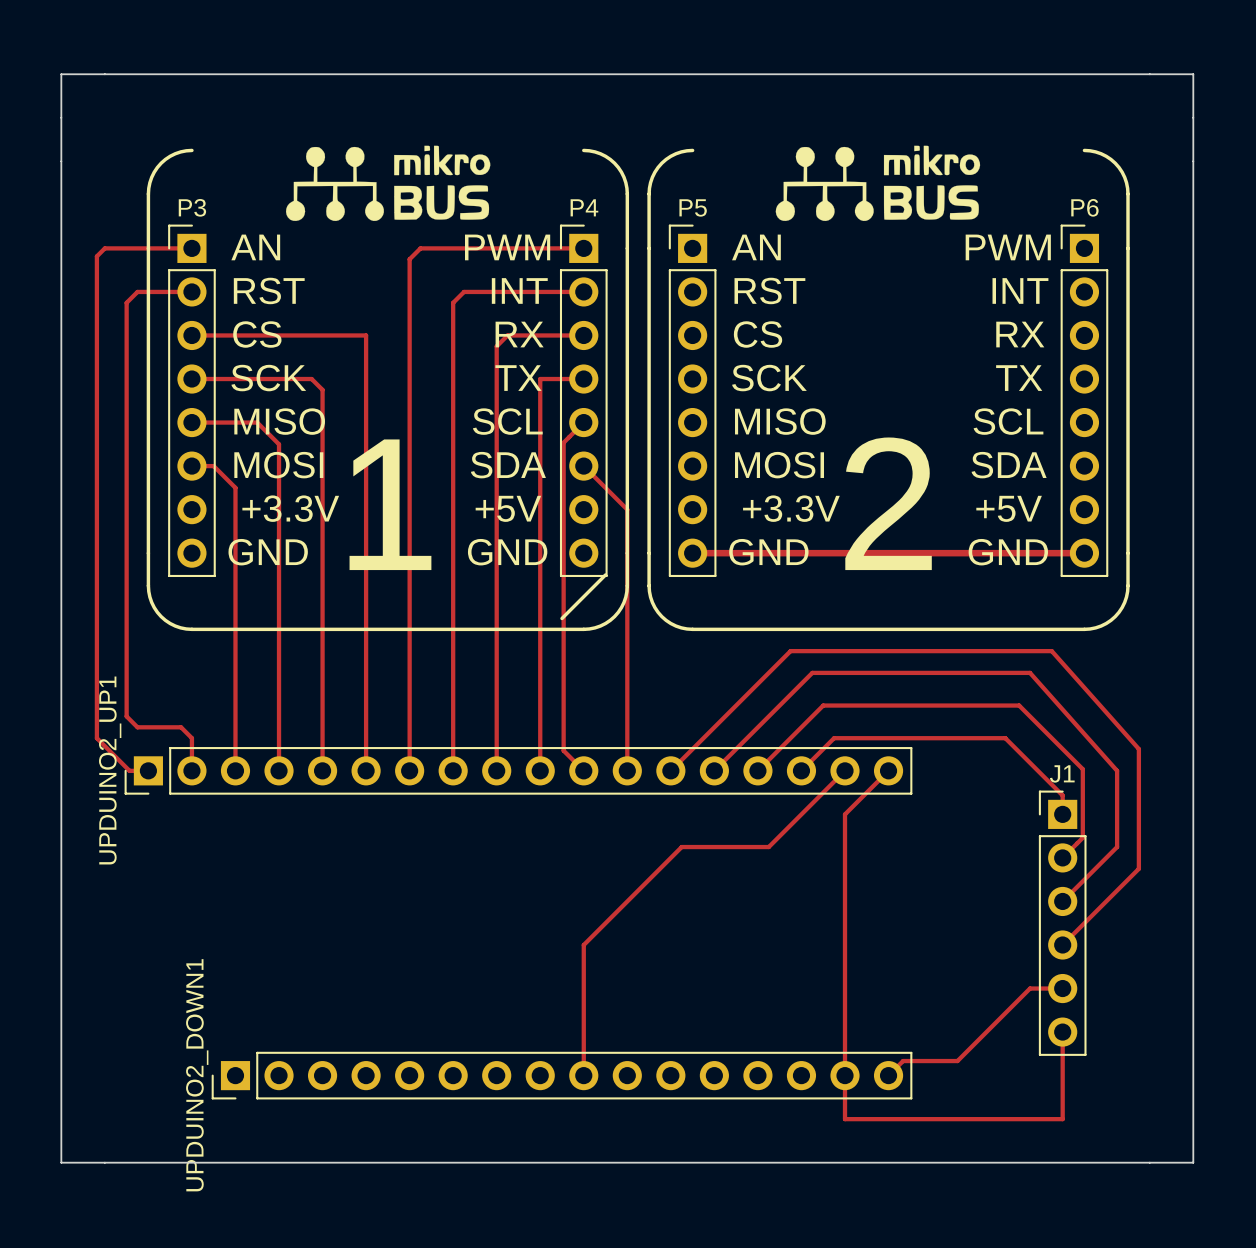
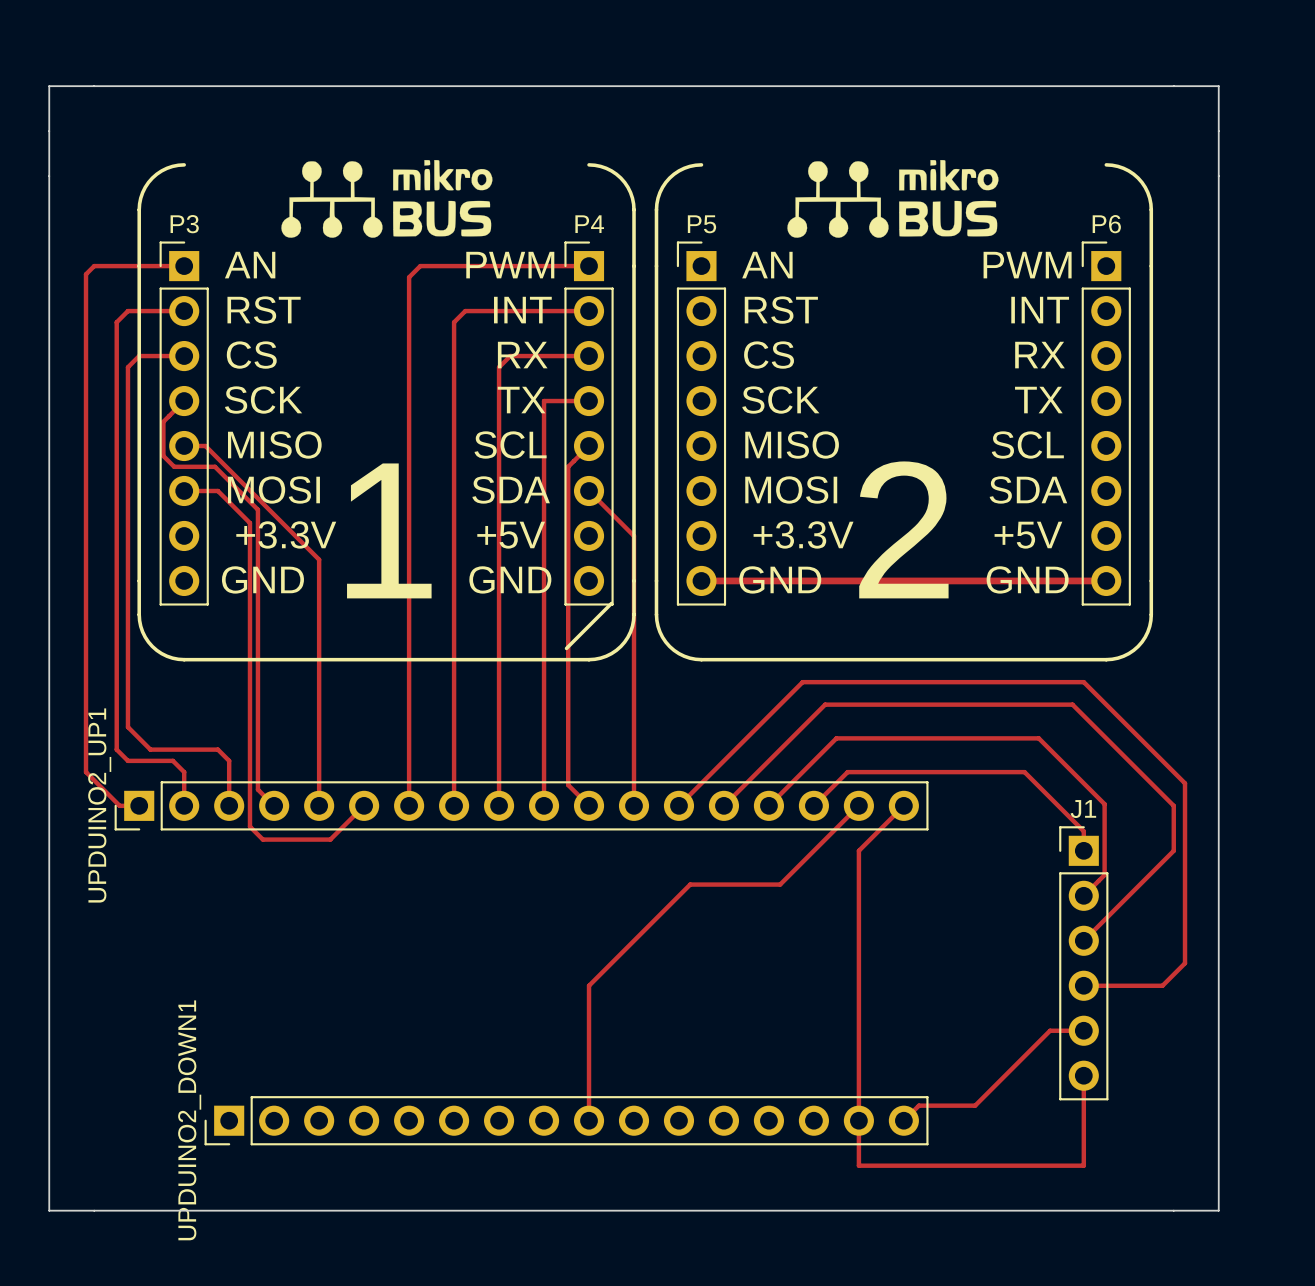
track: (191, 335) (366, 335) (366, 770) -> (206, 490) (217, 490) (249, 523) (249, 826) (262, 839) (330, 839) (364, 805)
track: (191, 379) (311, 379) (322, 389) (322, 532) -> (205, 446) (319, 559)
track: (212, 422) (257, 422) (279, 444) (279, 770) -> (184, 401) (163, 421) (163, 455) (174, 466) (215, 466) (257, 509) (257, 789) (274, 805)
track: (213, 466) (235, 487) (235, 727) -> (184, 356) (139, 356) (127, 367) (127, 727) (150, 749) (217, 749) (229, 760)
track: (1051, 651) (1138, 749) (1138, 868) (1062, 945) -> (1072, 682) (1083, 682) (1185, 783) (1185, 963) (1162, 985) (1083, 985)
track: (1030, 672) (1117, 770) (1117, 847) -> (1050, 704) (1072, 704) (1173, 805) (1173, 850) (1140, 884)

